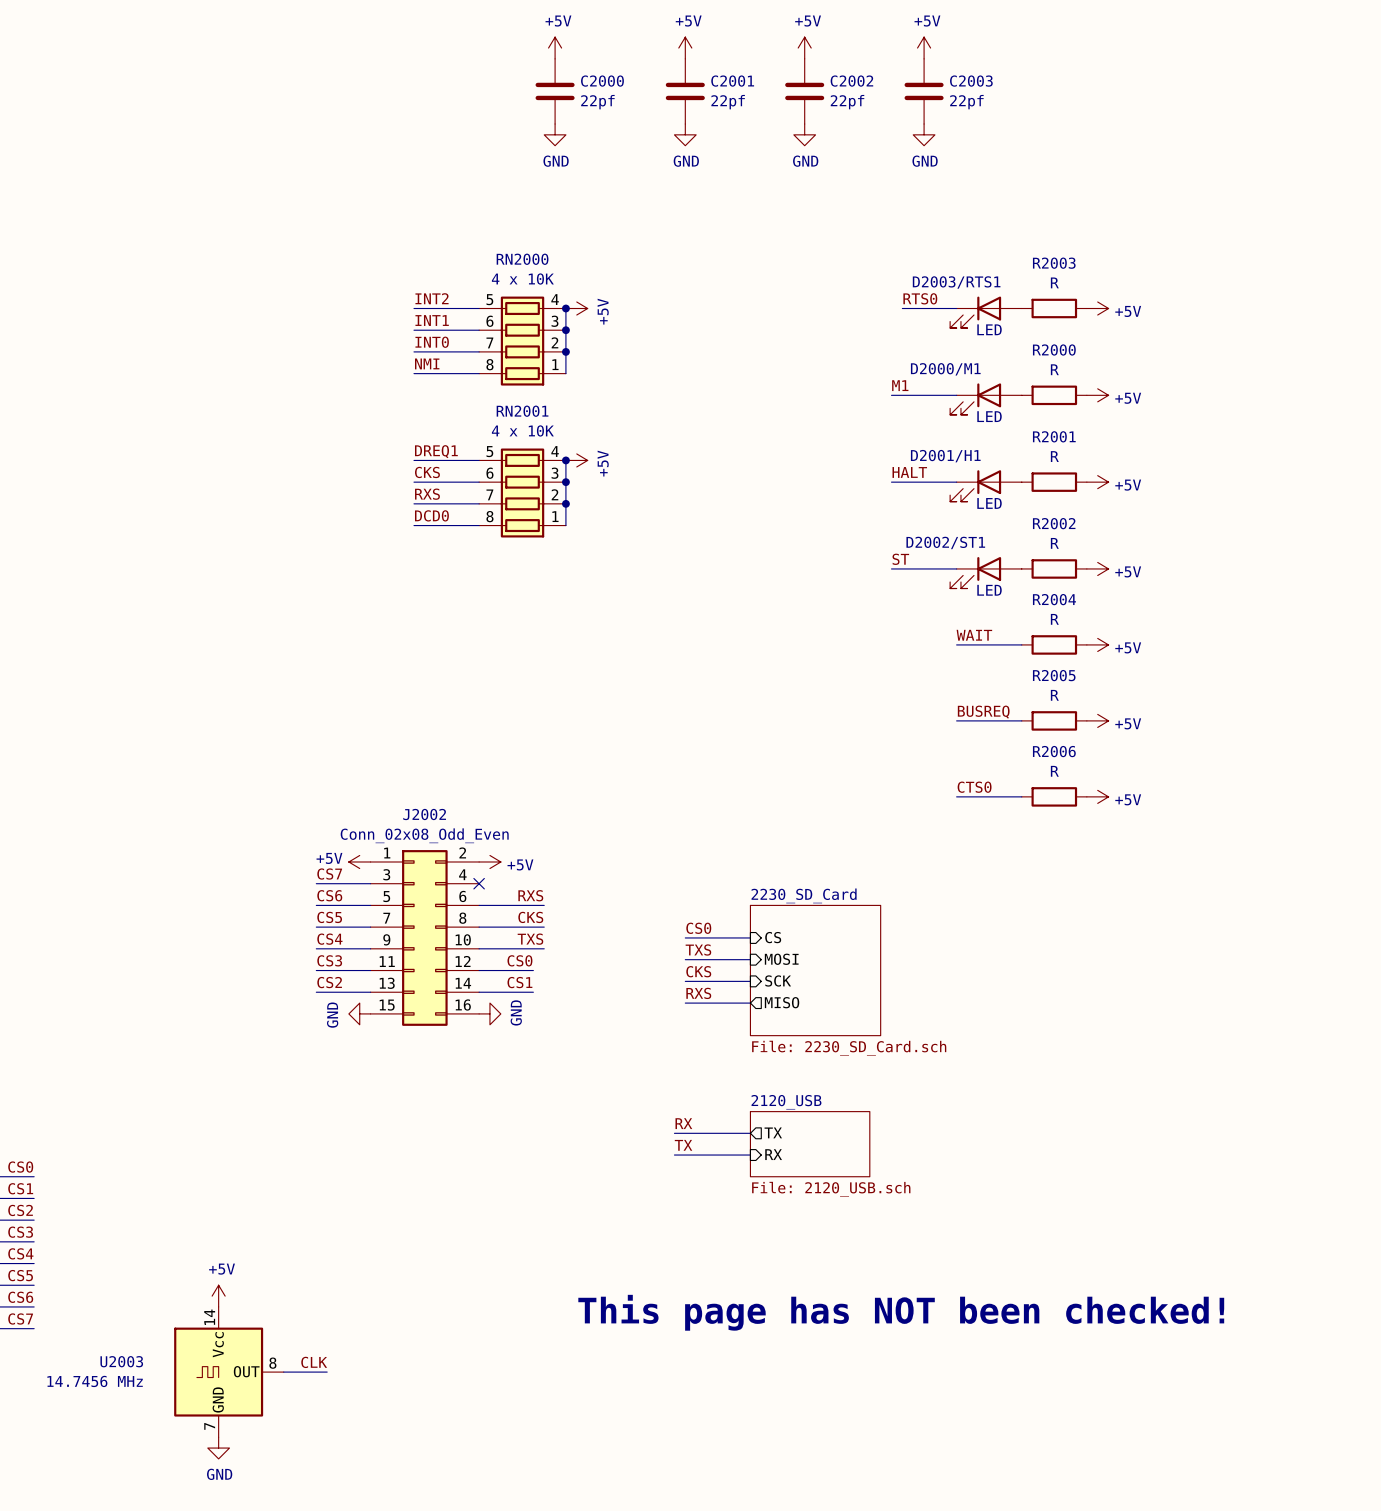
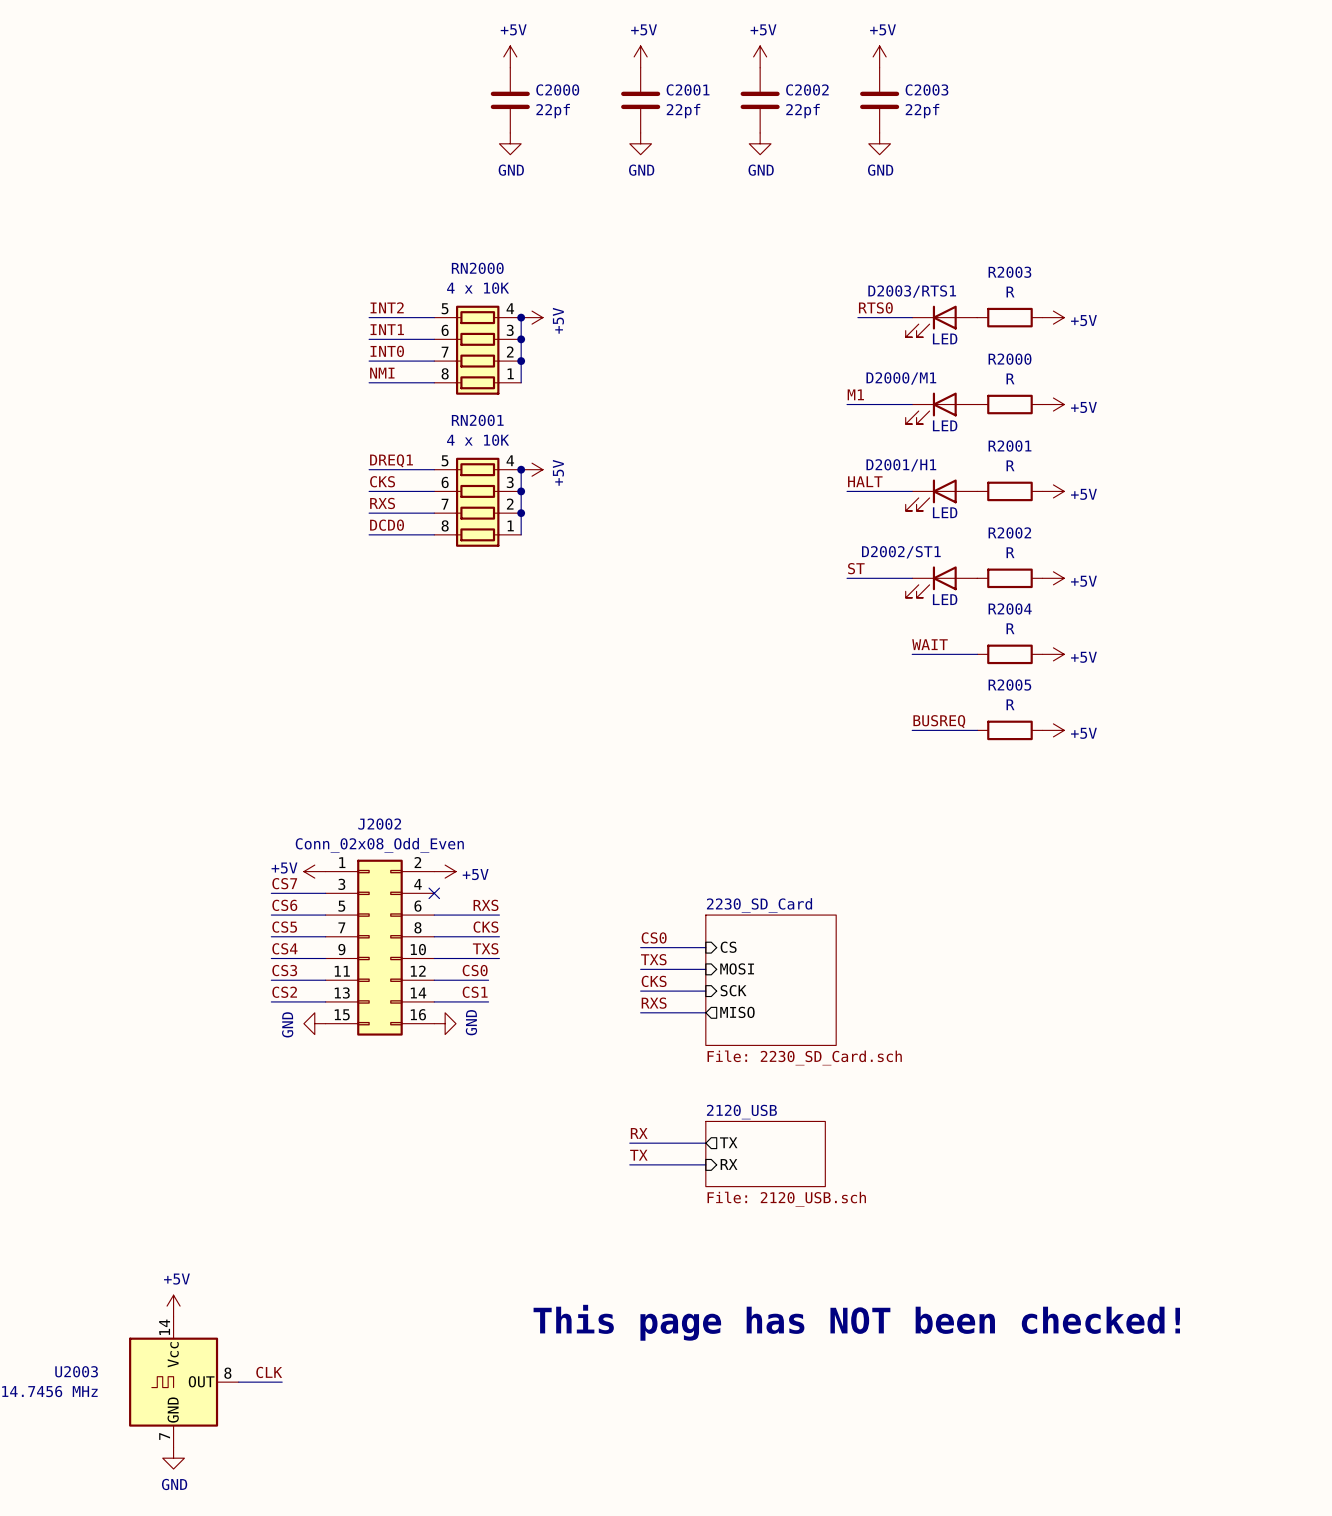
label: CTS0 (974, 787) -> none
wire: (956, 796) (1021, 796) -> none
R2006: R (1054, 796) -> none
power symbol: +5V (1097, 796) -> none

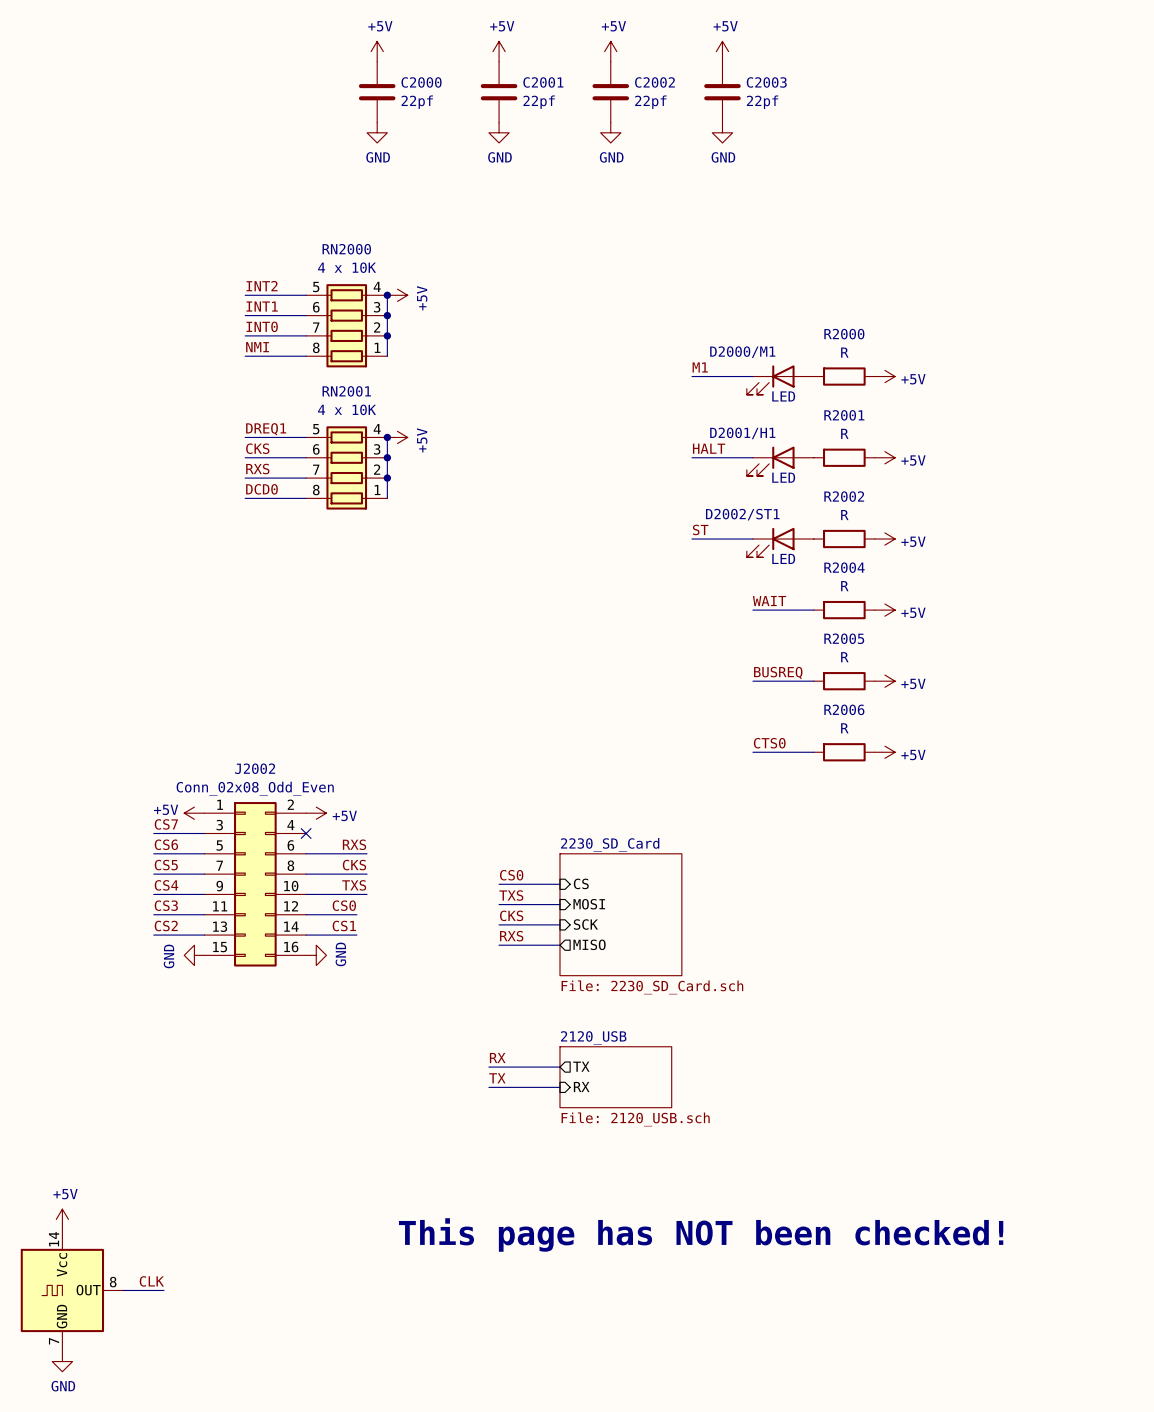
label: RTS0 (875, 307) -> none
wire: (857, 317) (912, 317) -> none
R2003: R (1009, 317) -> none
power symbol: +5V (1053, 317) -> none
D2003/RTS1: LED (941, 321) -> none
label: none -> CTS0 (769, 743)
wire: none -> (752, 752) (813, 752)
R2006: none -> R (844, 752)
power symbol: none -> +5V (884, 752)

